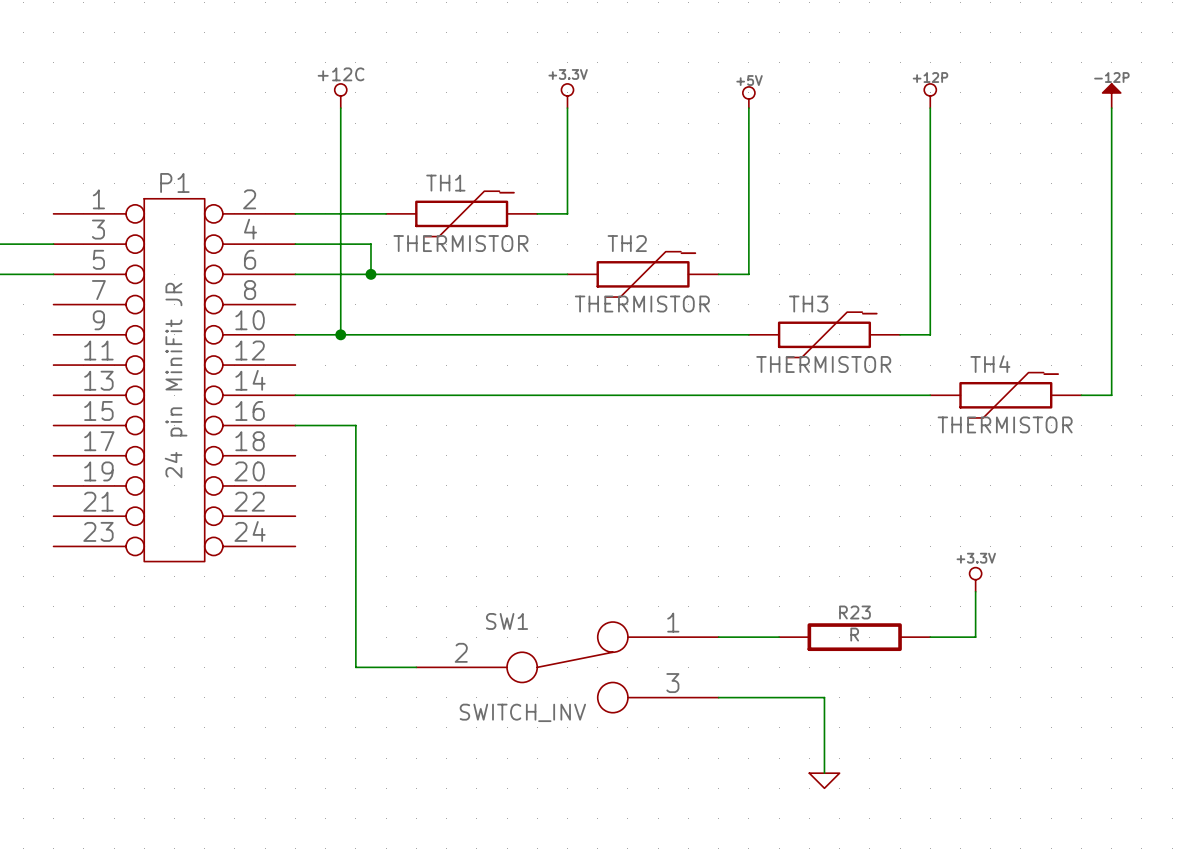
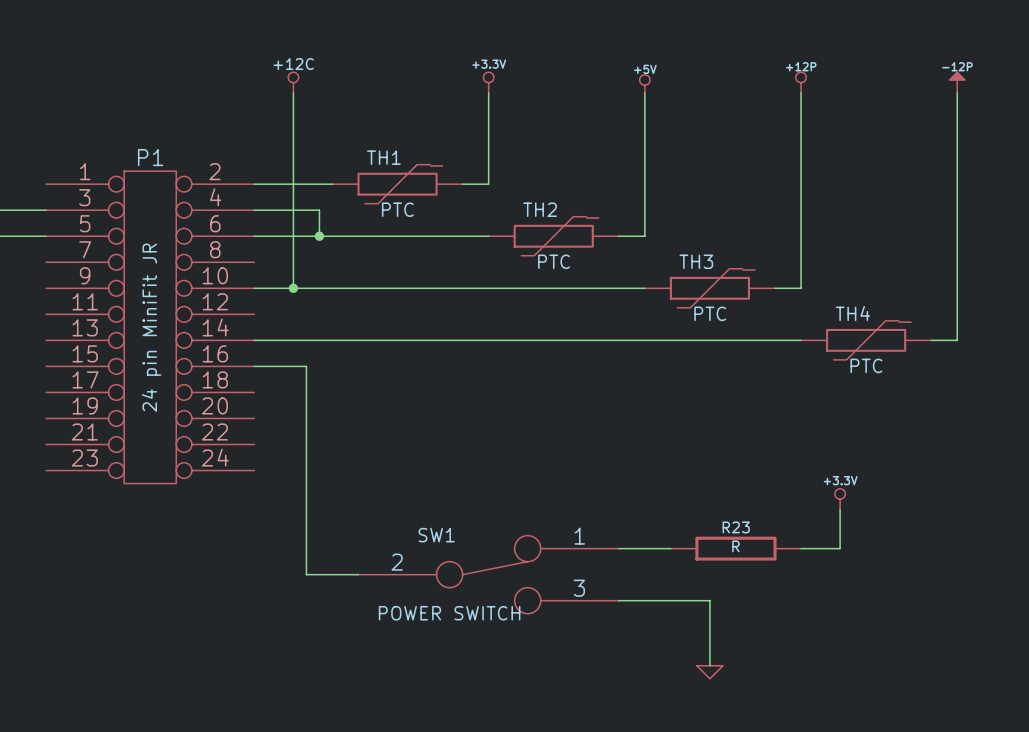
TH1 value: THERMISTOR (460, 243) -> PTC (397, 209)
TH2 value: THERMISTOR (642, 304) -> PTC (554, 261)
TH3 value: THERMISTOR (823, 364) -> PTC (710, 313)
TH4 value: THERMISTOR (1005, 424) -> PTC (866, 365)
SW1 value: SWITCH_INV (522, 712) -> POWER SWITCH (449, 613)

